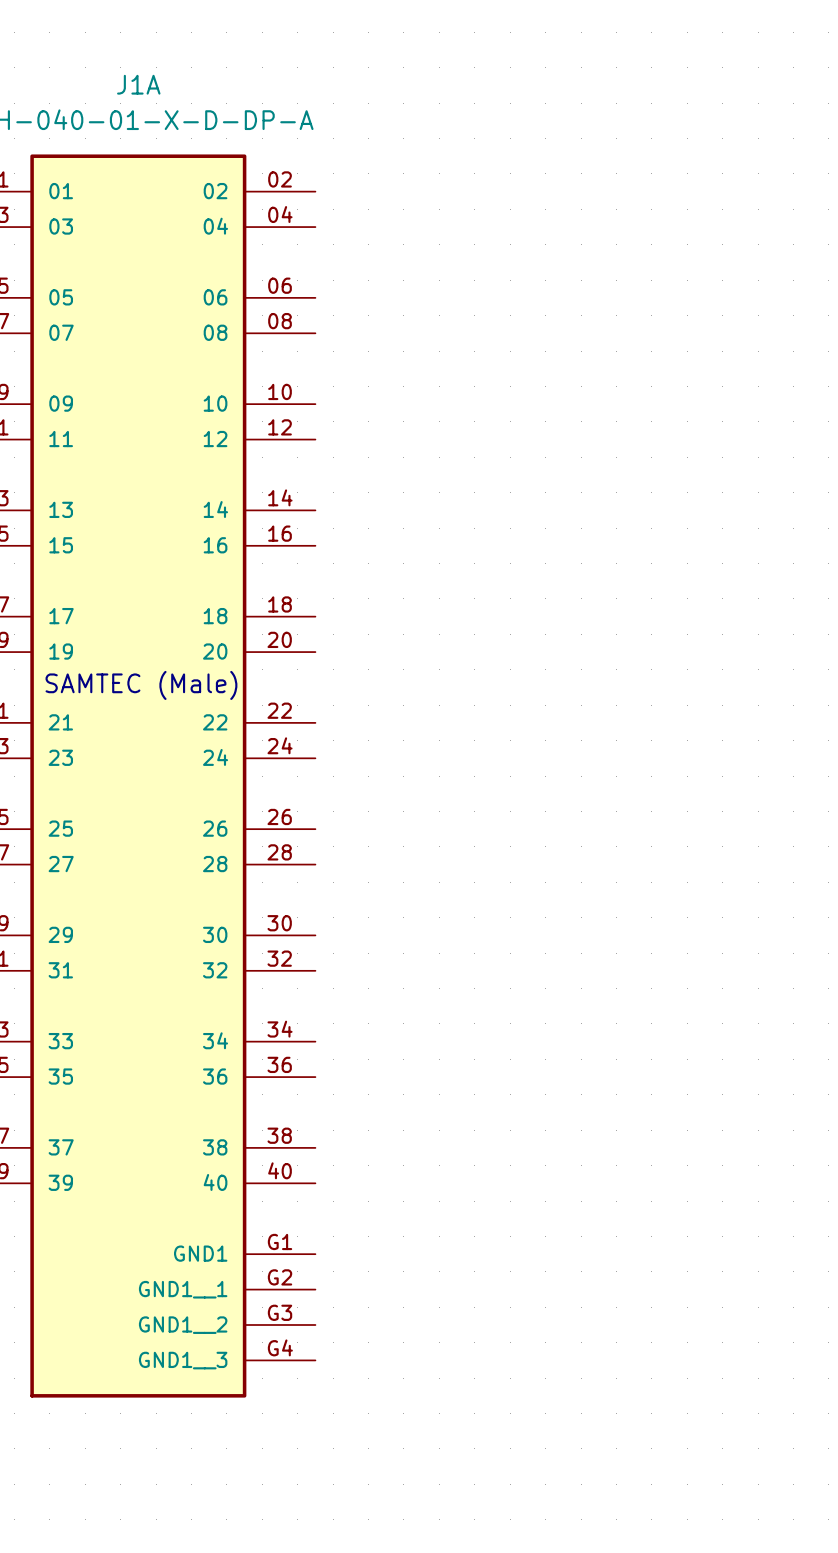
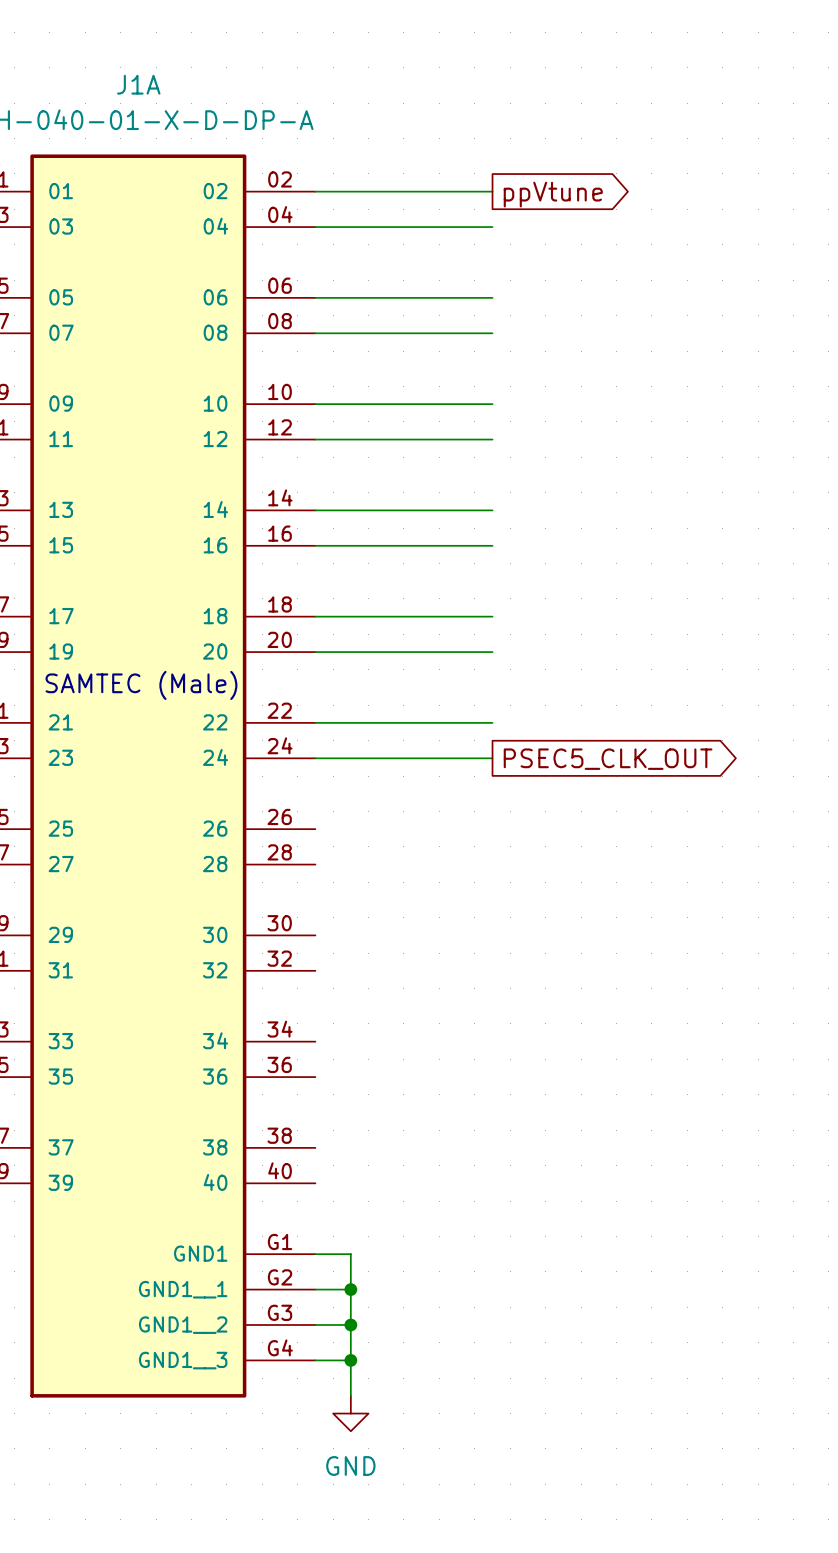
wire: none -> (315, 191) (492, 191)
global label: none -> ppVtune (553, 194)
wire: none -> (315, 227) (492, 227)
wire: none -> (315, 297) (492, 297)
wire: none -> (315, 333) (492, 333)
wire: none -> (315, 404) (492, 404)
wire: none -> (315, 439) (492, 439)
wire: none -> (315, 510) (492, 510)
wire: none -> (315, 545) (492, 545)
wire: none -> (315, 616) (492, 616)
wire: none -> (315, 652) (492, 652)
wire: none -> (315, 722) (492, 722)
wire: none -> (315, 758) (492, 758)
global label: none -> PSEC5_CLK_OUT (608, 759)
wire: none -> (315, 1254) (350, 1254) (350, 1395)
wire: none -> (315, 1289) (350, 1289)
junction: none -> (350, 1289)
wire: none -> (315, 1325) (350, 1325)
junction: none -> (350, 1325)
wire: none -> (315, 1360) (350, 1360)
junction: none -> (350, 1360)
power symbol: none -> GND (350, 1413)

